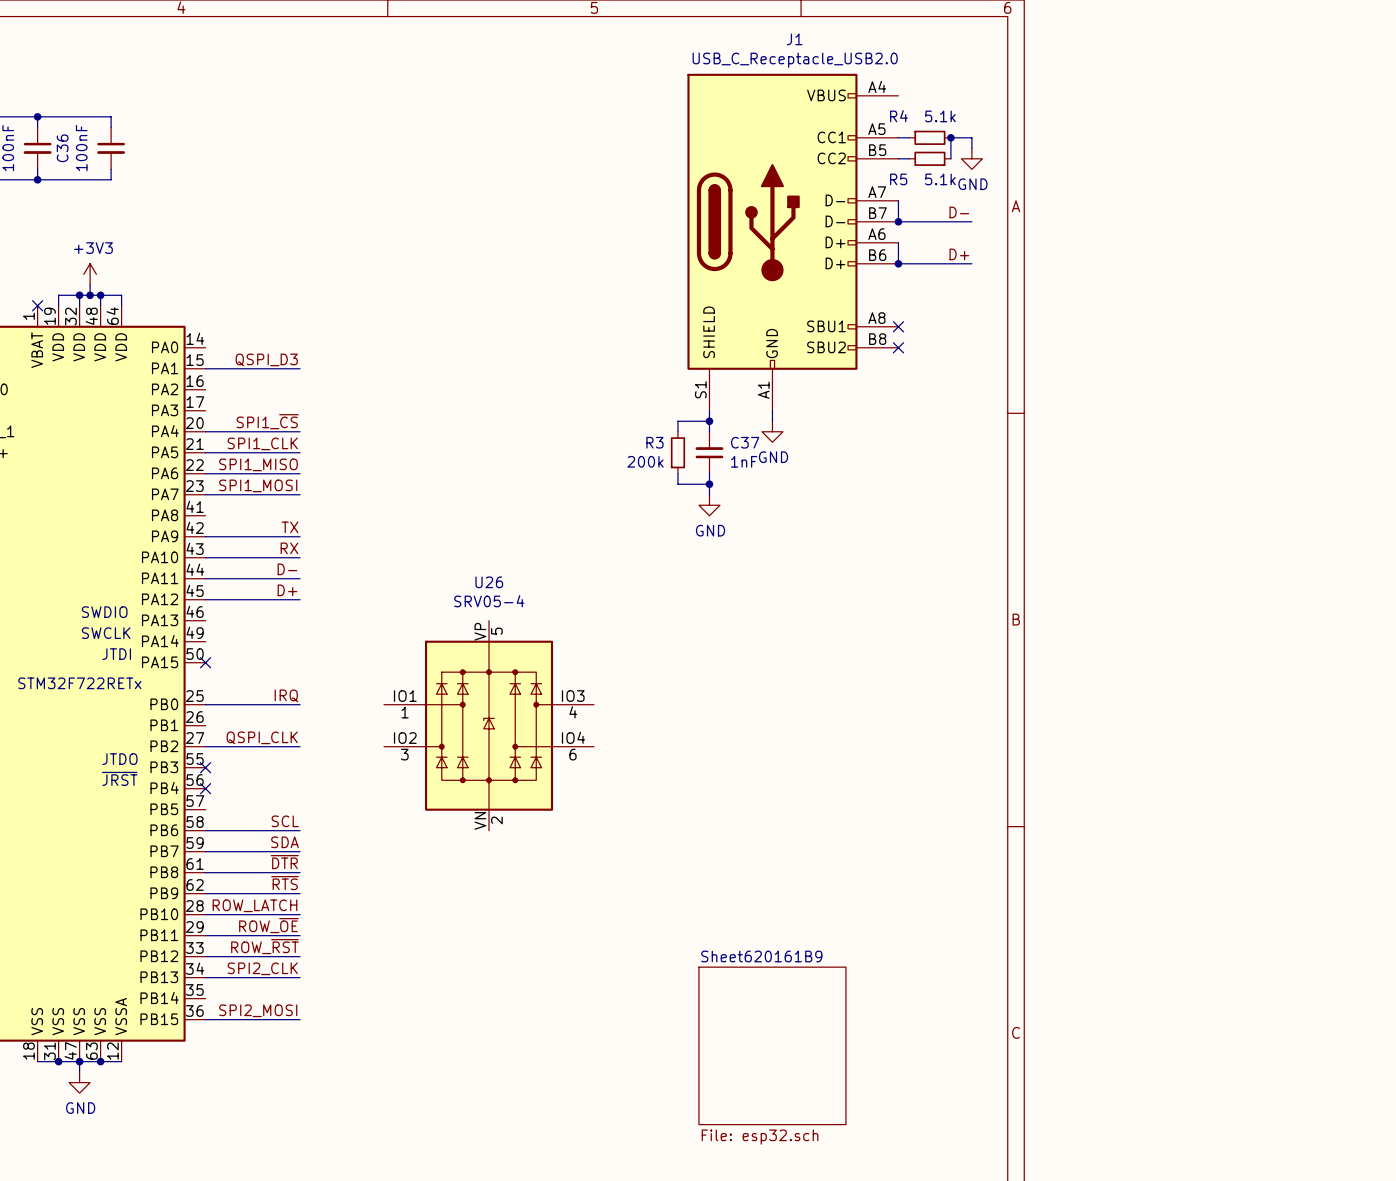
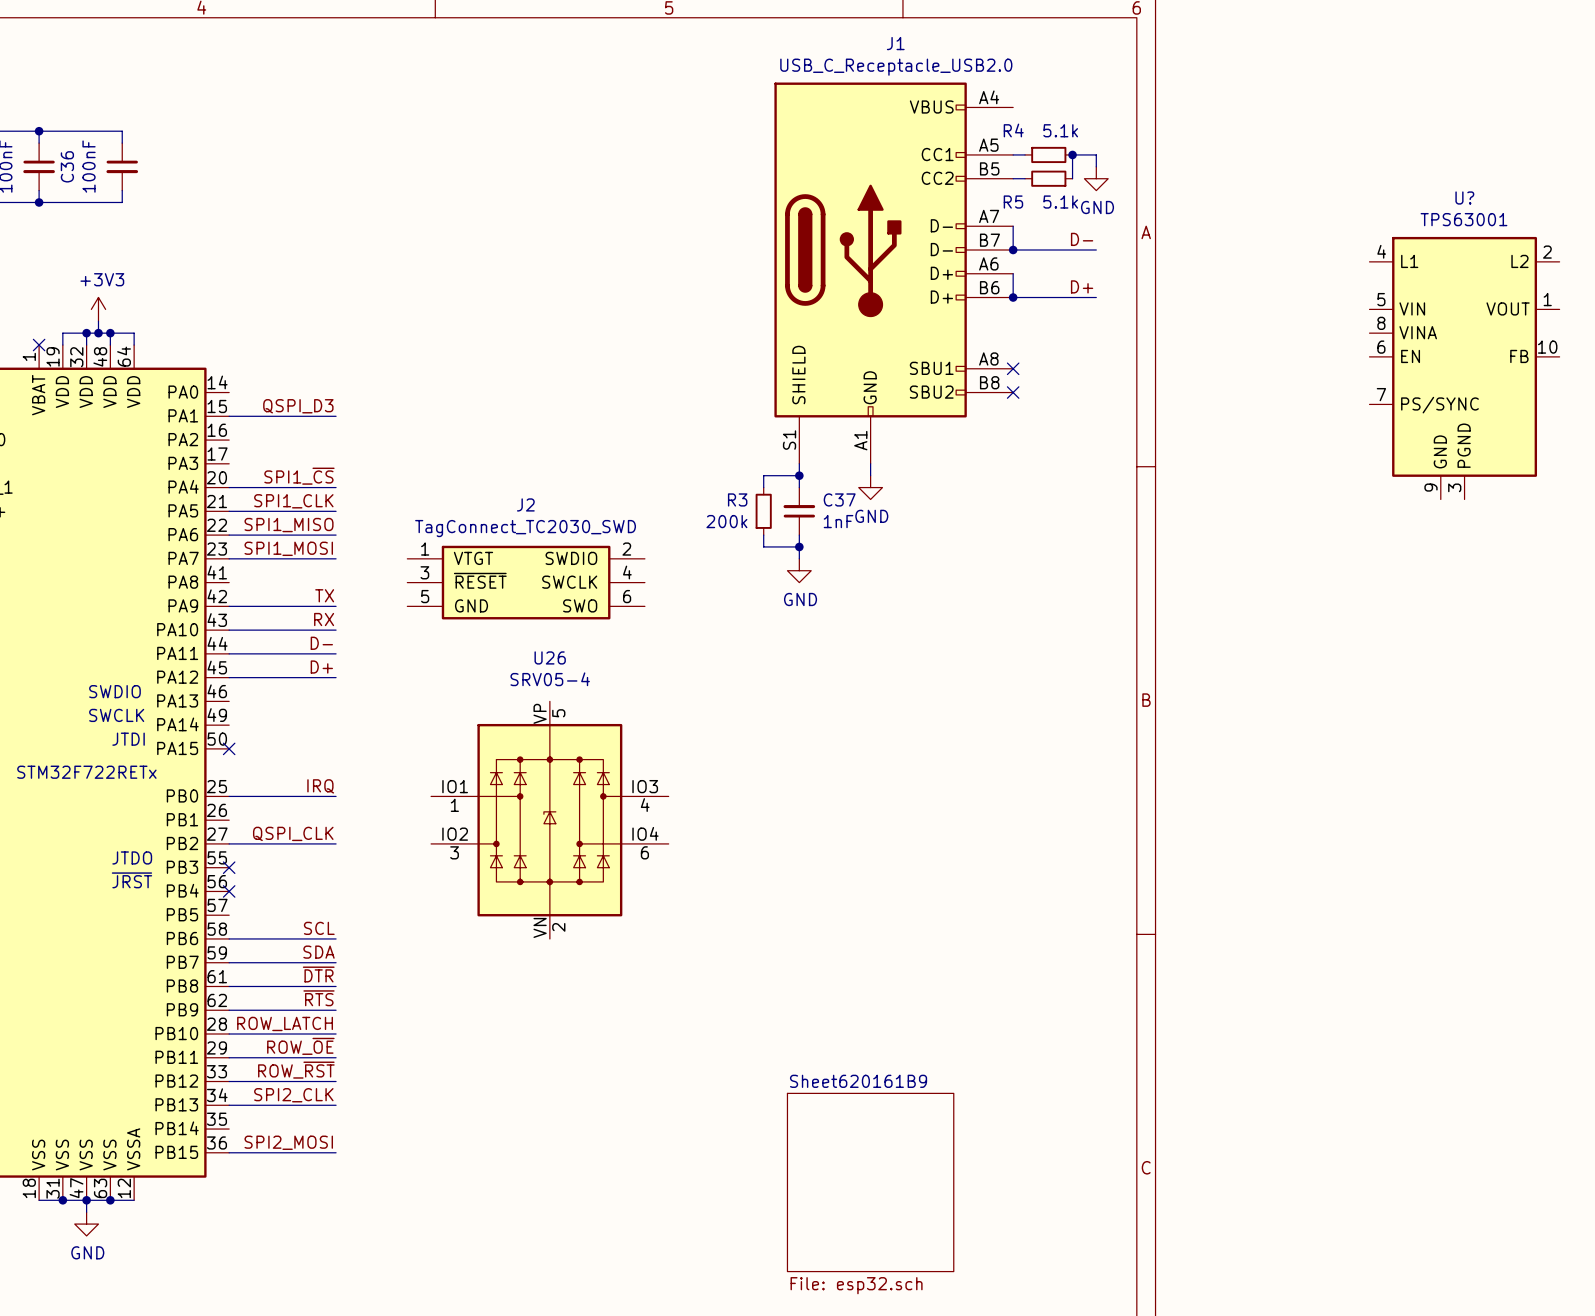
U?: none -> TPS63001 (1464, 368)
J2: none -> TagConnect_TC2030_SWD (526, 582)

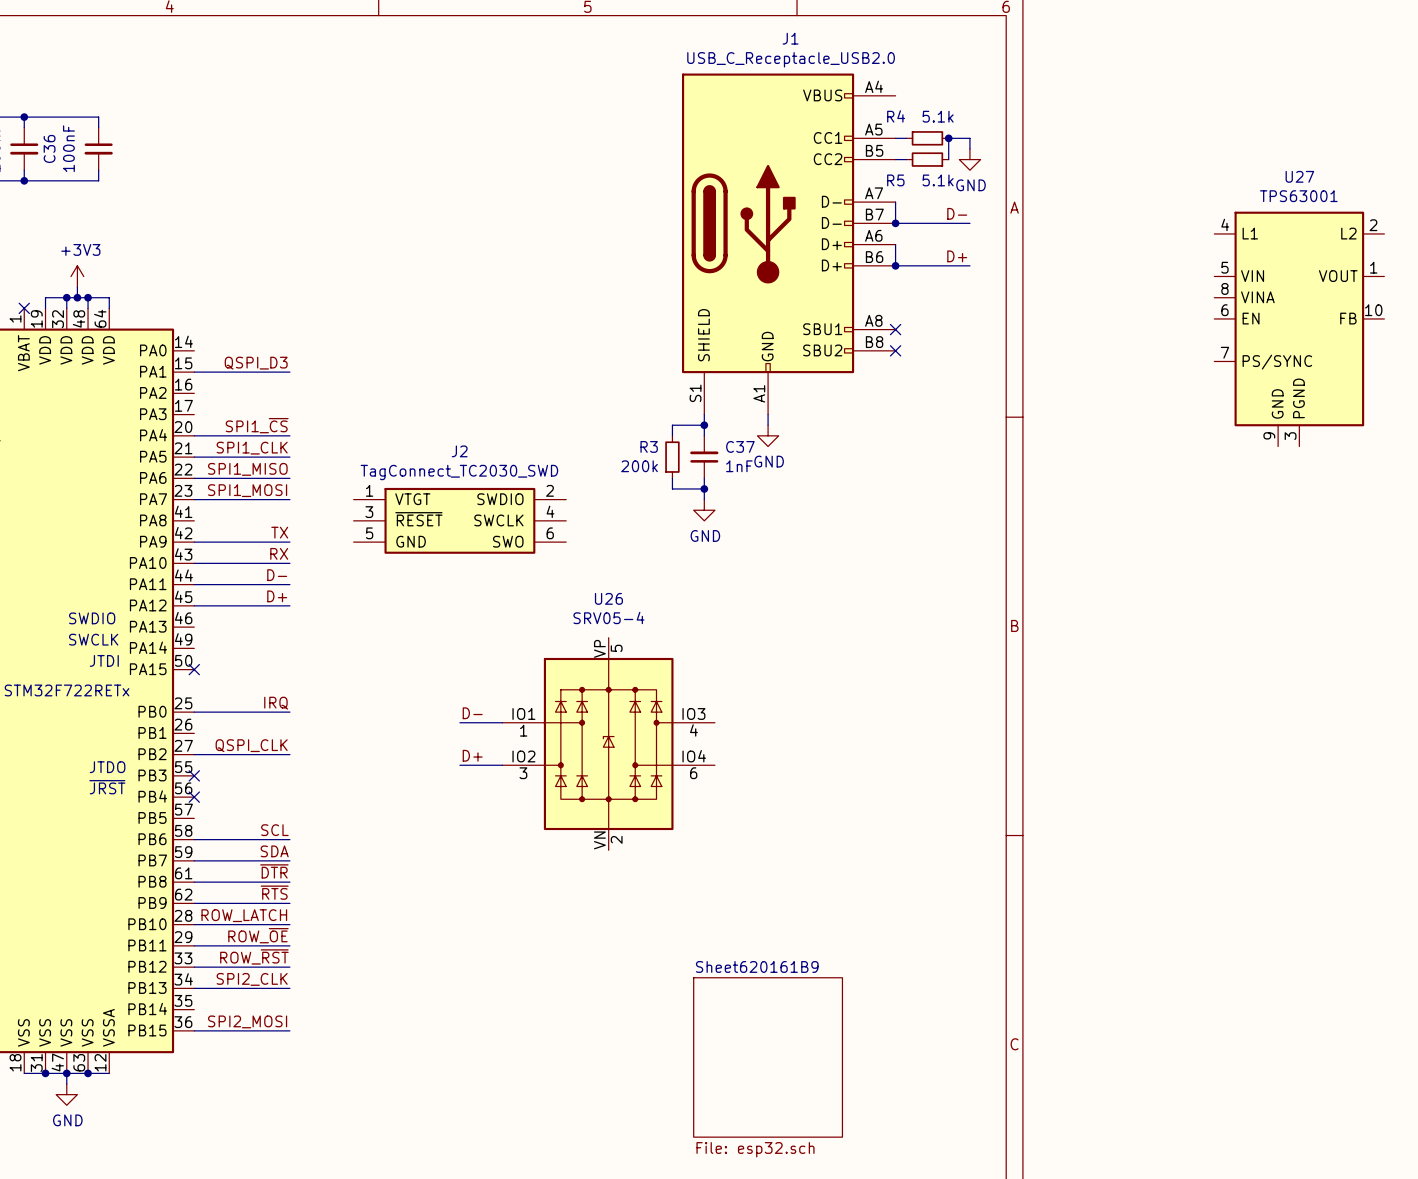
U? name: U? (1464, 198) -> U27 (1299, 176)
label: none -> D- (472, 713)
U26 position: (549, 820) -> (608, 744)
label: none -> D+ (472, 755)

